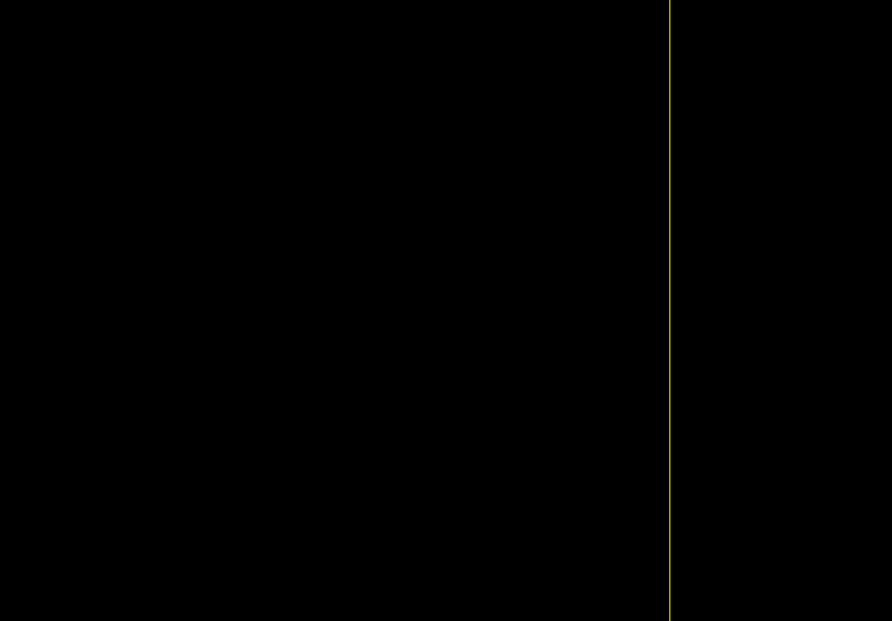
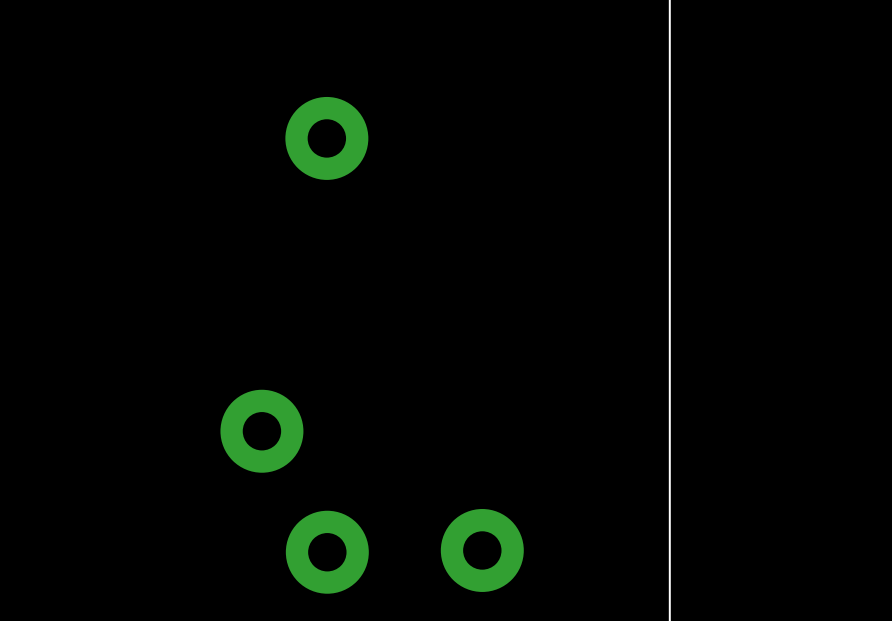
via: none -> (326, 138)
via: none -> (261, 431)
via: none -> (482, 550)
via: none -> (327, 552)

